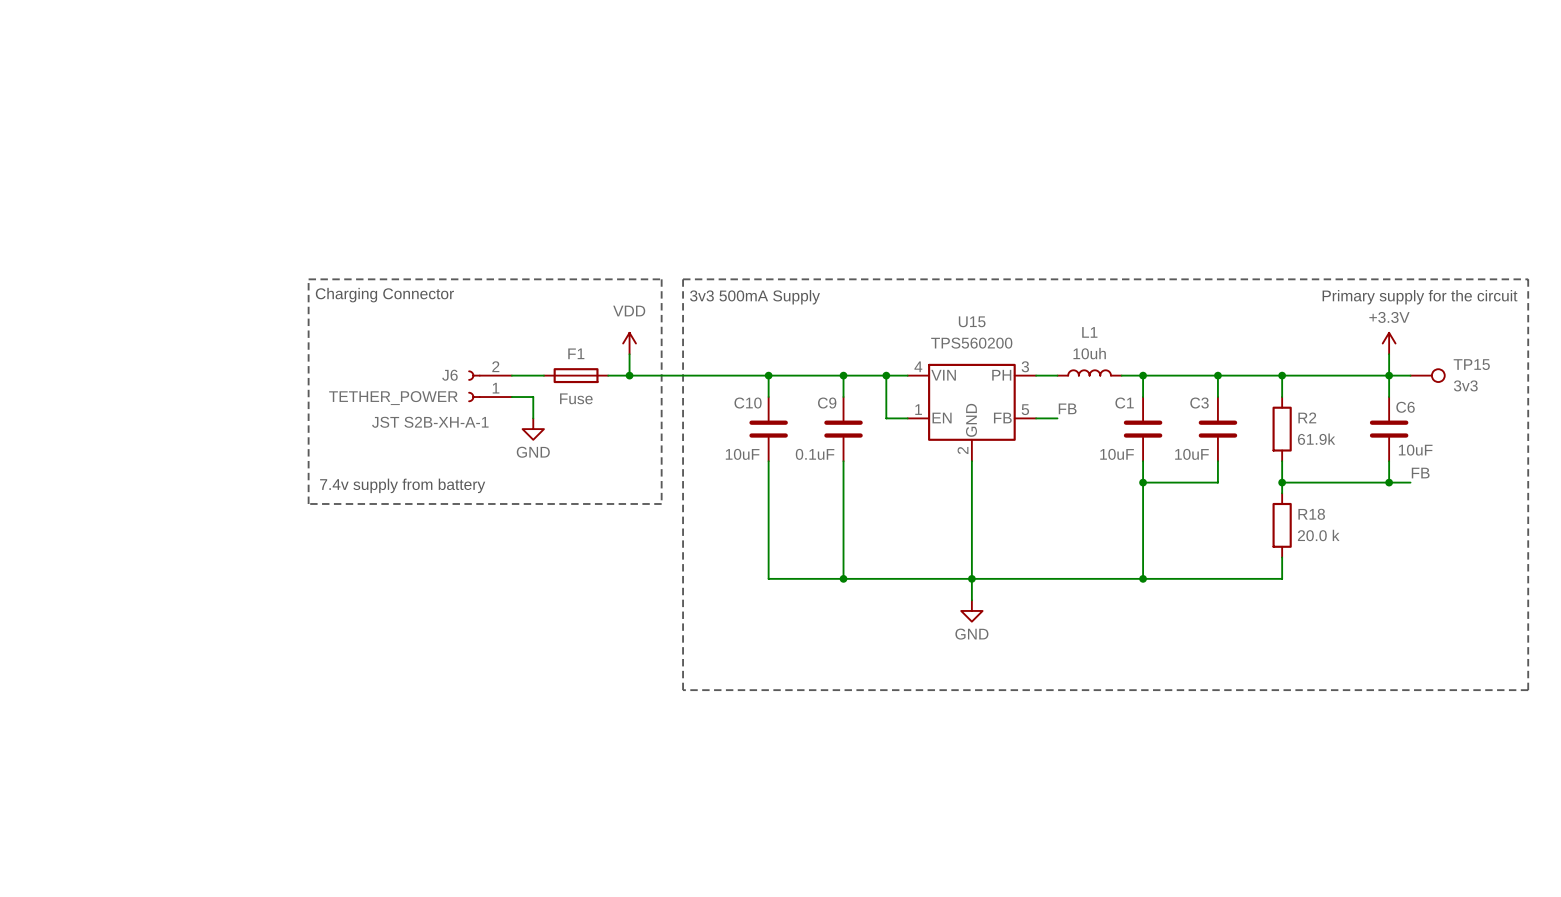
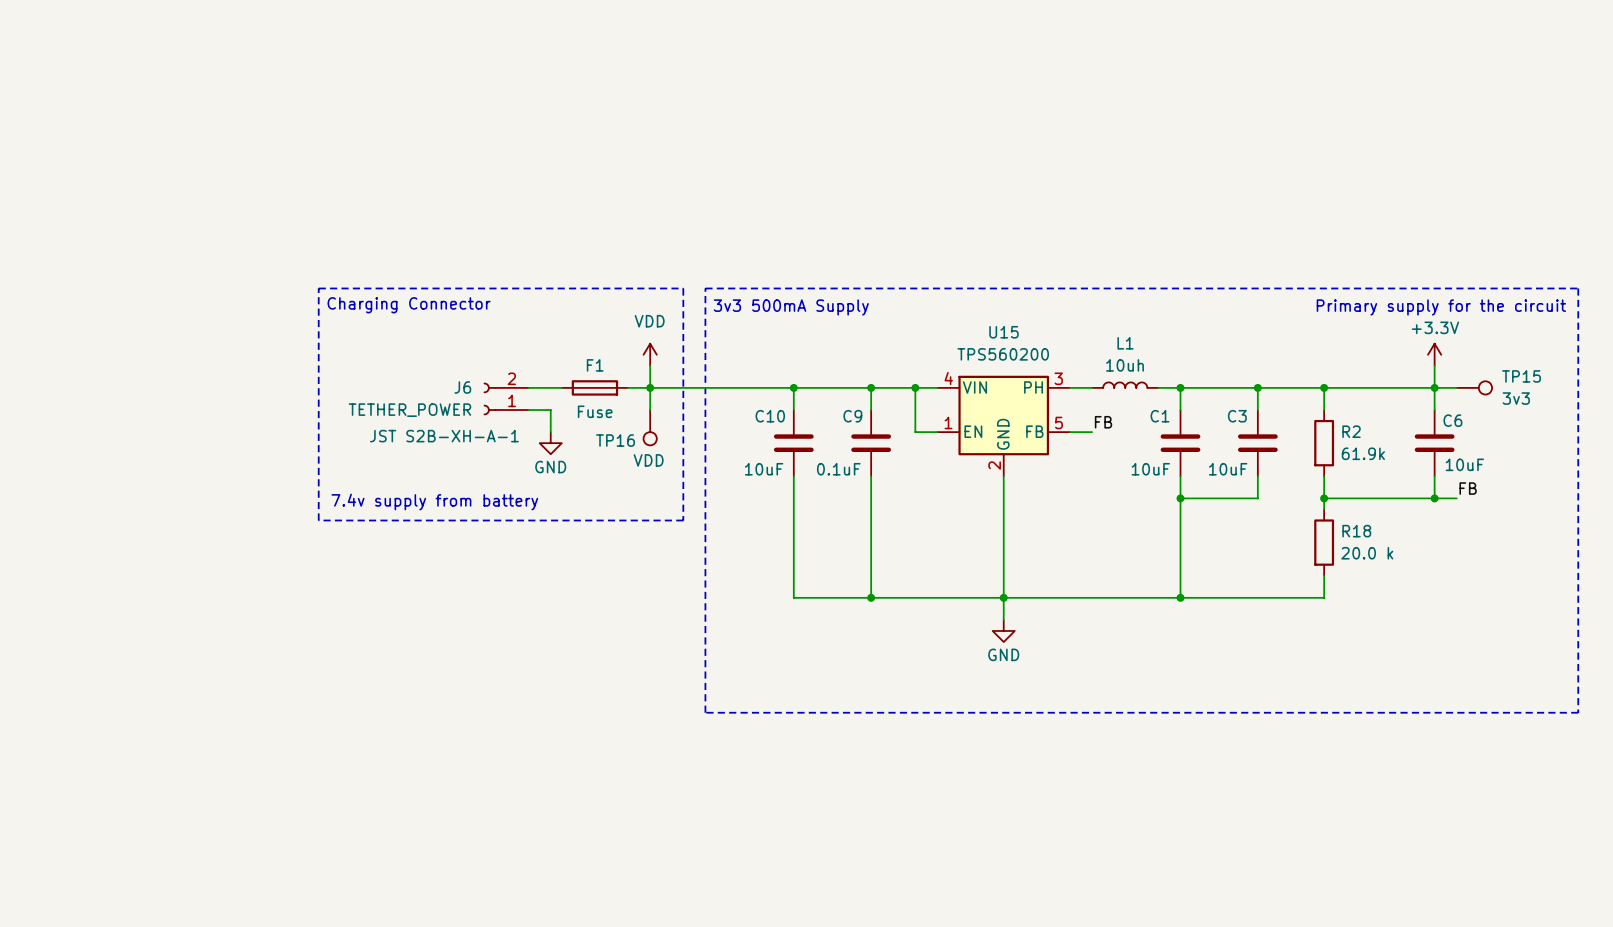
wire: none -> (650, 387) (650, 410)
TP16: none -> VDD (650, 427)

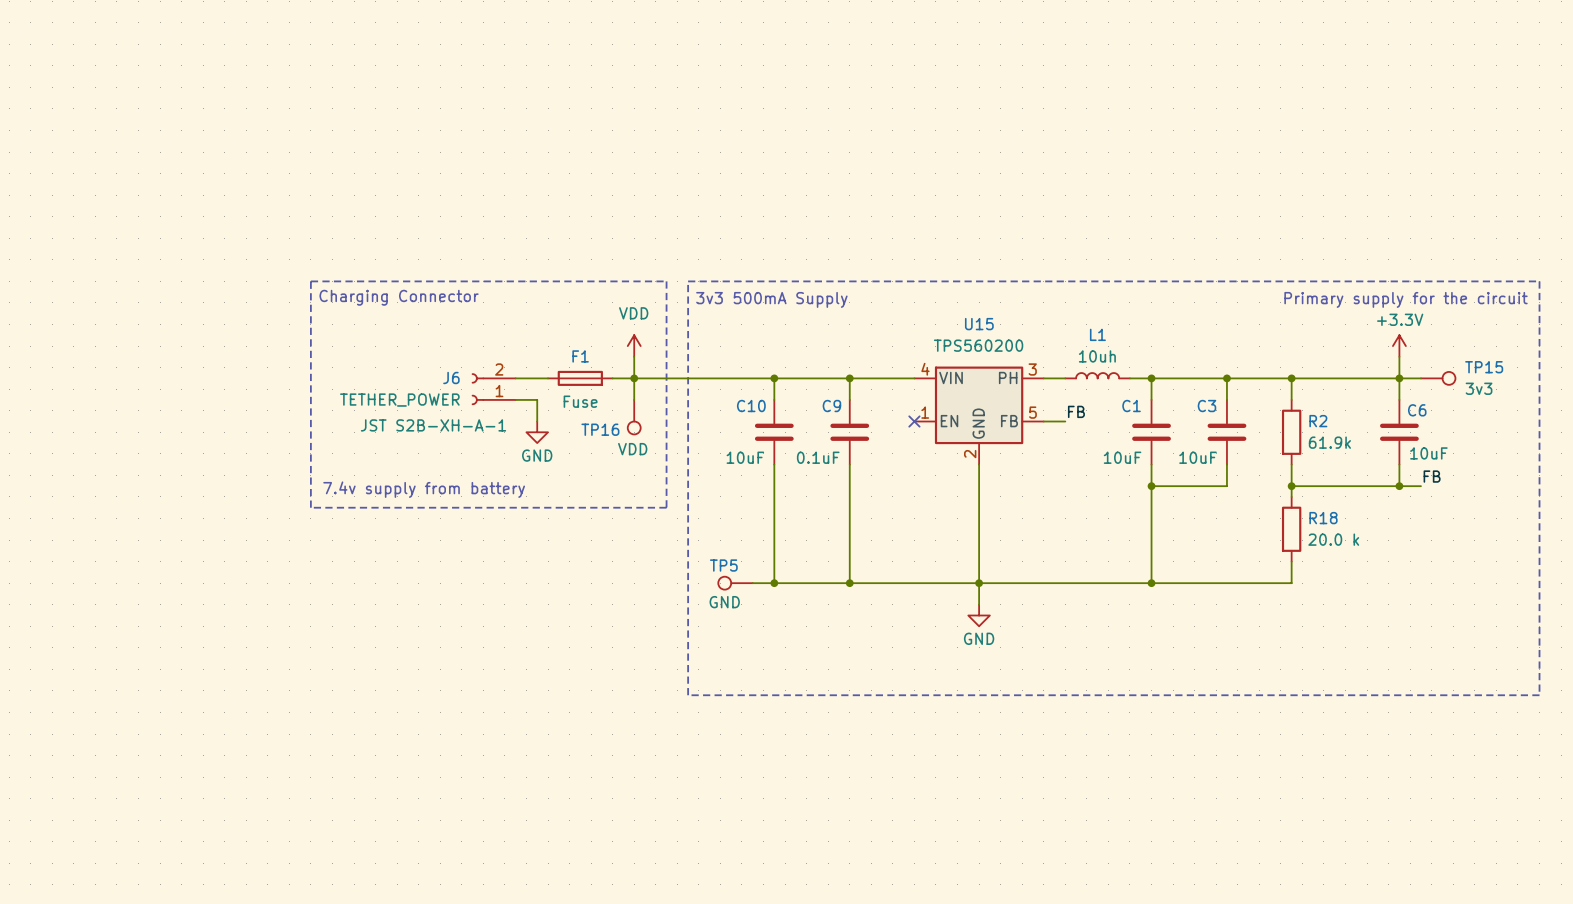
wire: (915, 387) (915, 432) (937, 432) -> none
junction: (915, 387) -> none
no-connect mark: none -> (914, 421)
TP5: none -> GND (735, 583)
wire: none -> (752, 583) (774, 583)
junction: none -> (774, 583)

